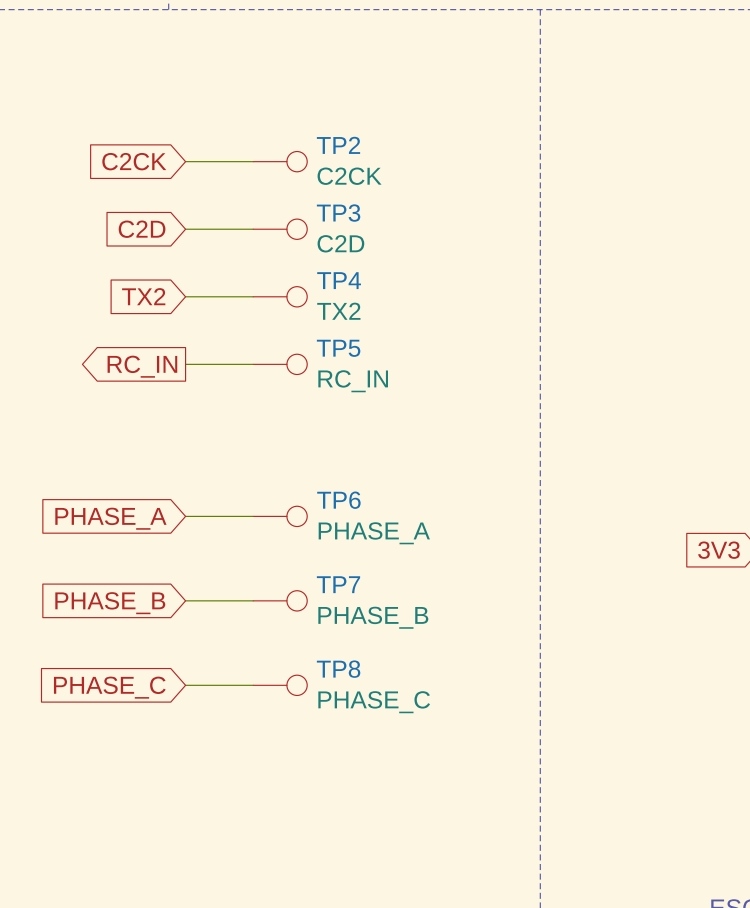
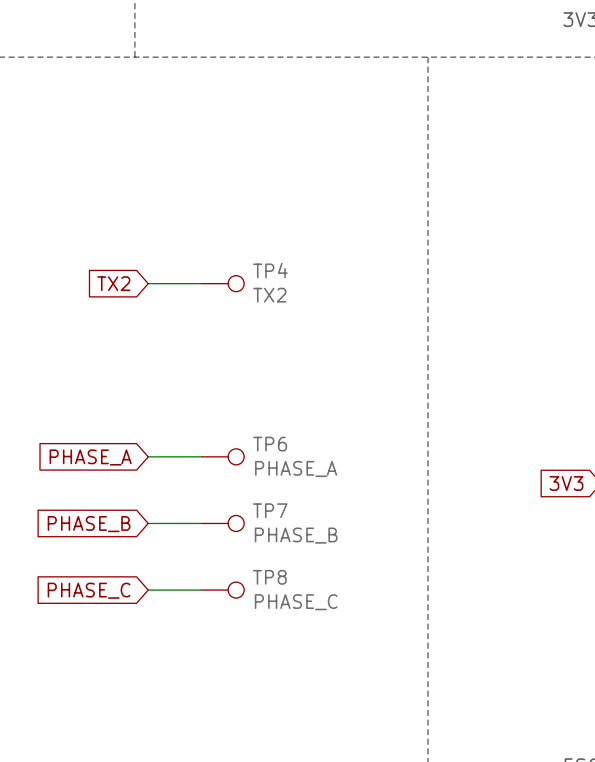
global label: C2CK (134, 161) -> none
wire: (185, 161) (253, 161) -> none
TP2: C2CK (280, 161) -> none
global label: C2D (142, 229) -> none
wire: (185, 229) (253, 229) -> none
TP3: C2D (280, 229) -> none
wire: (185, 364) (253, 364) -> none
TP5: RC_IN (280, 364) -> none
global label: RC_IN (142, 366) -> none

